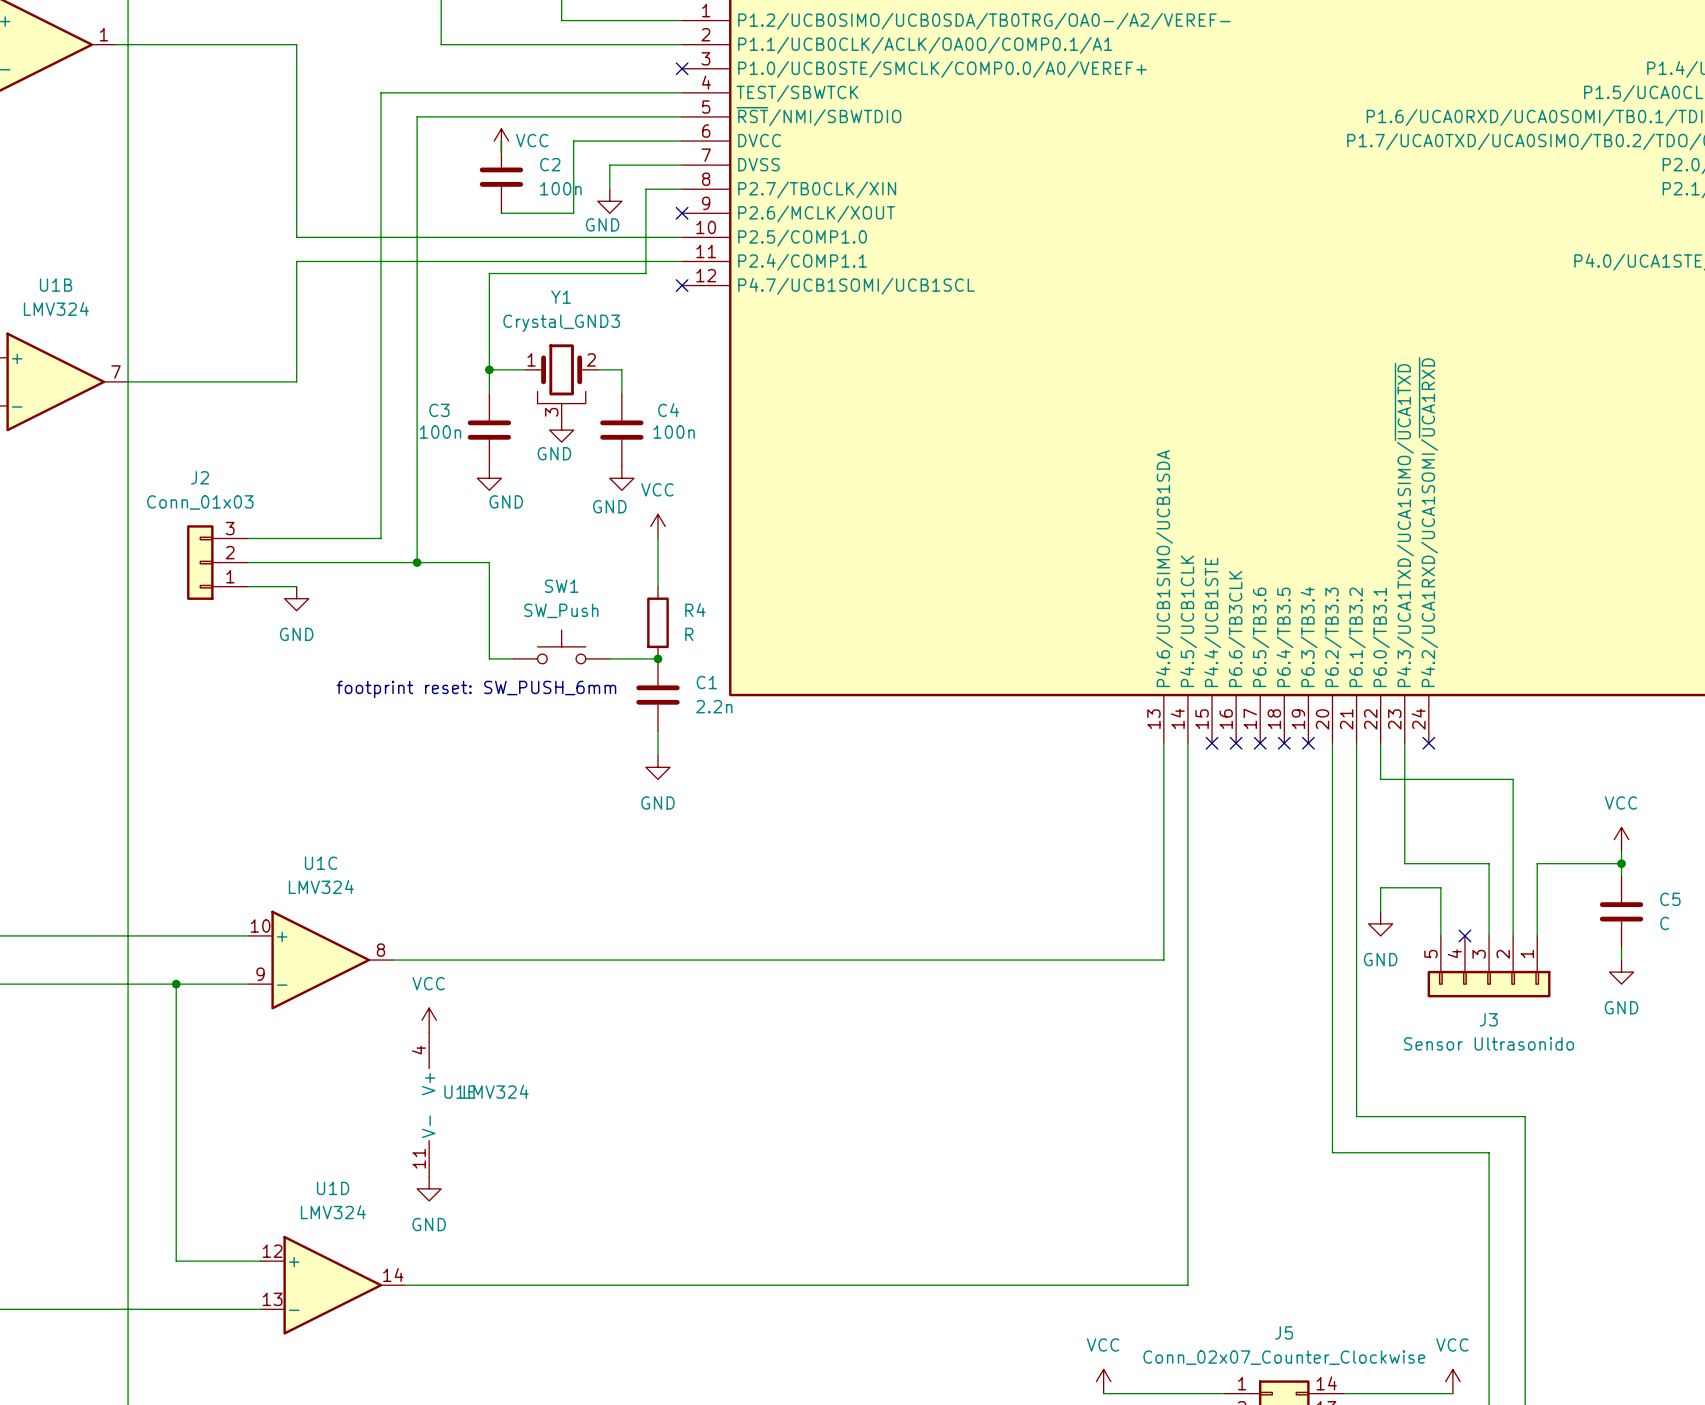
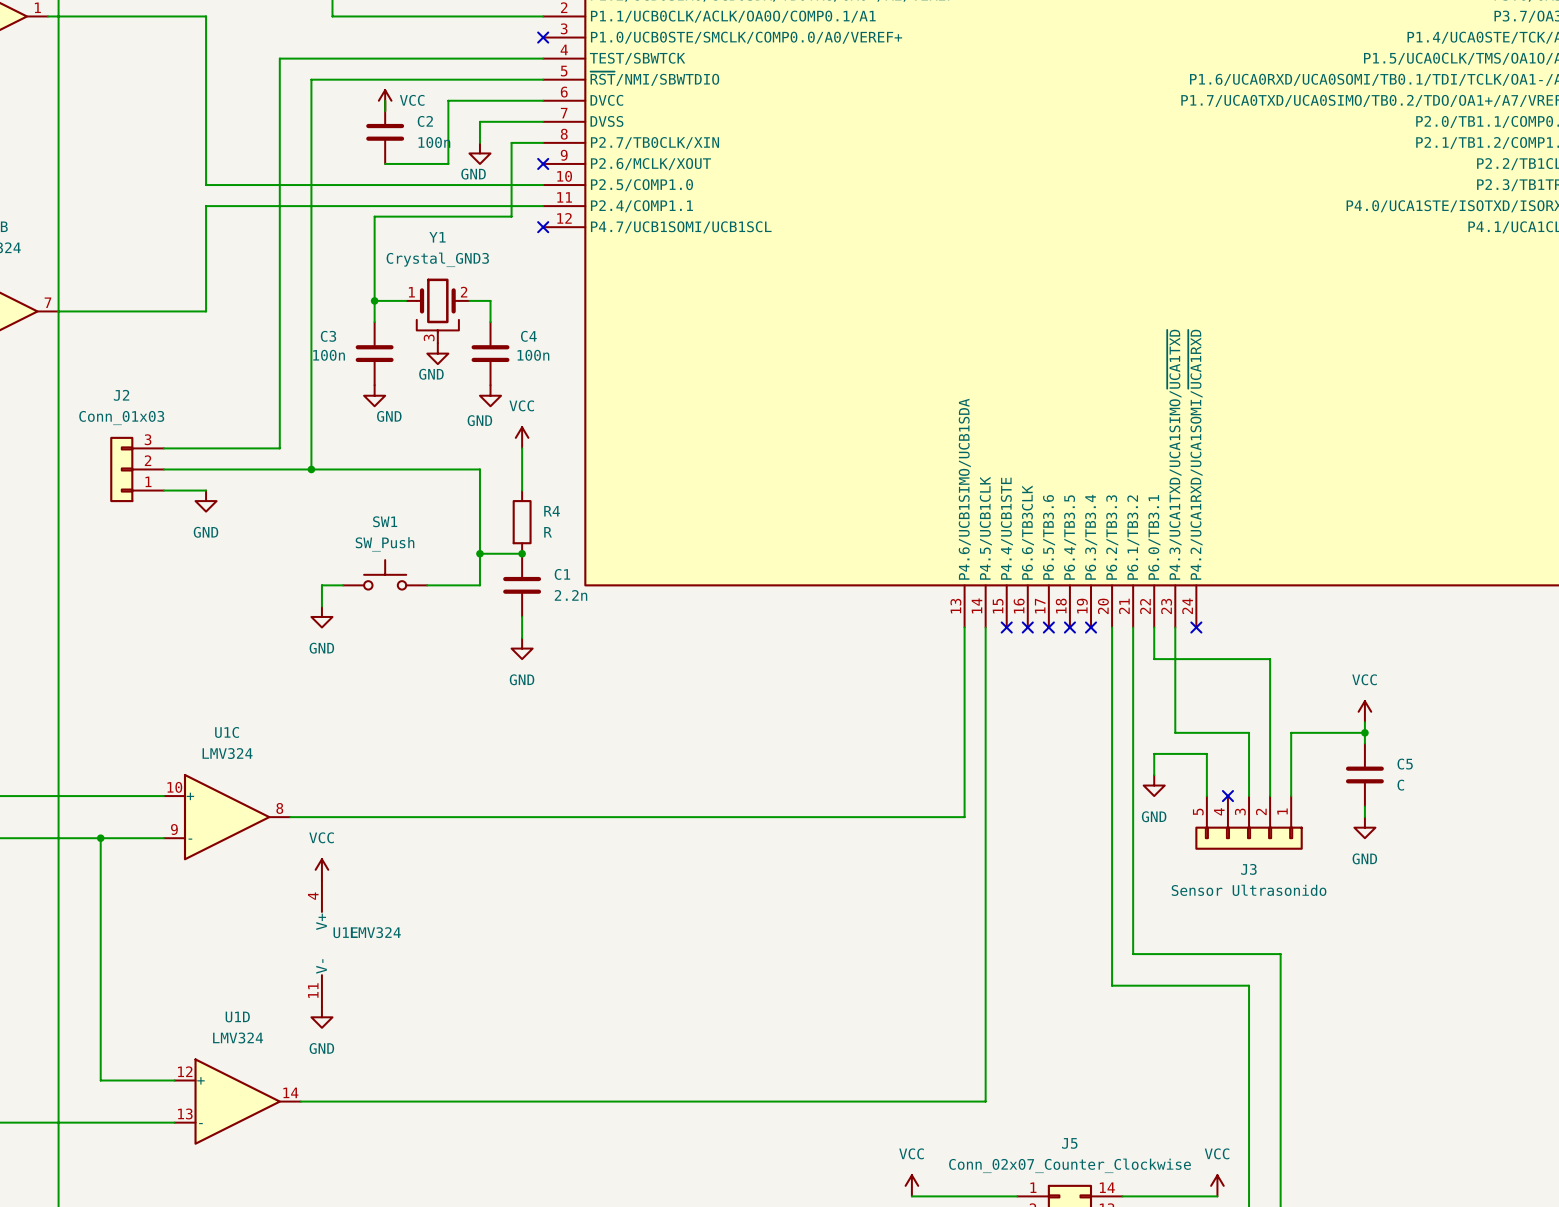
wire: (489, 562) (489, 658) (513, 658) -> (374, 469) (479, 469) (479, 585) (427, 585)
SW1 position: (561, 646) -> (385, 574)
junction: none -> (479, 553)
text: footprint reset: SW_PUSH_6mm (476, 689) -> none
wire: none -> (343, 585) (321, 585) (321, 606)
power symbol: none -> GND (321, 616)

